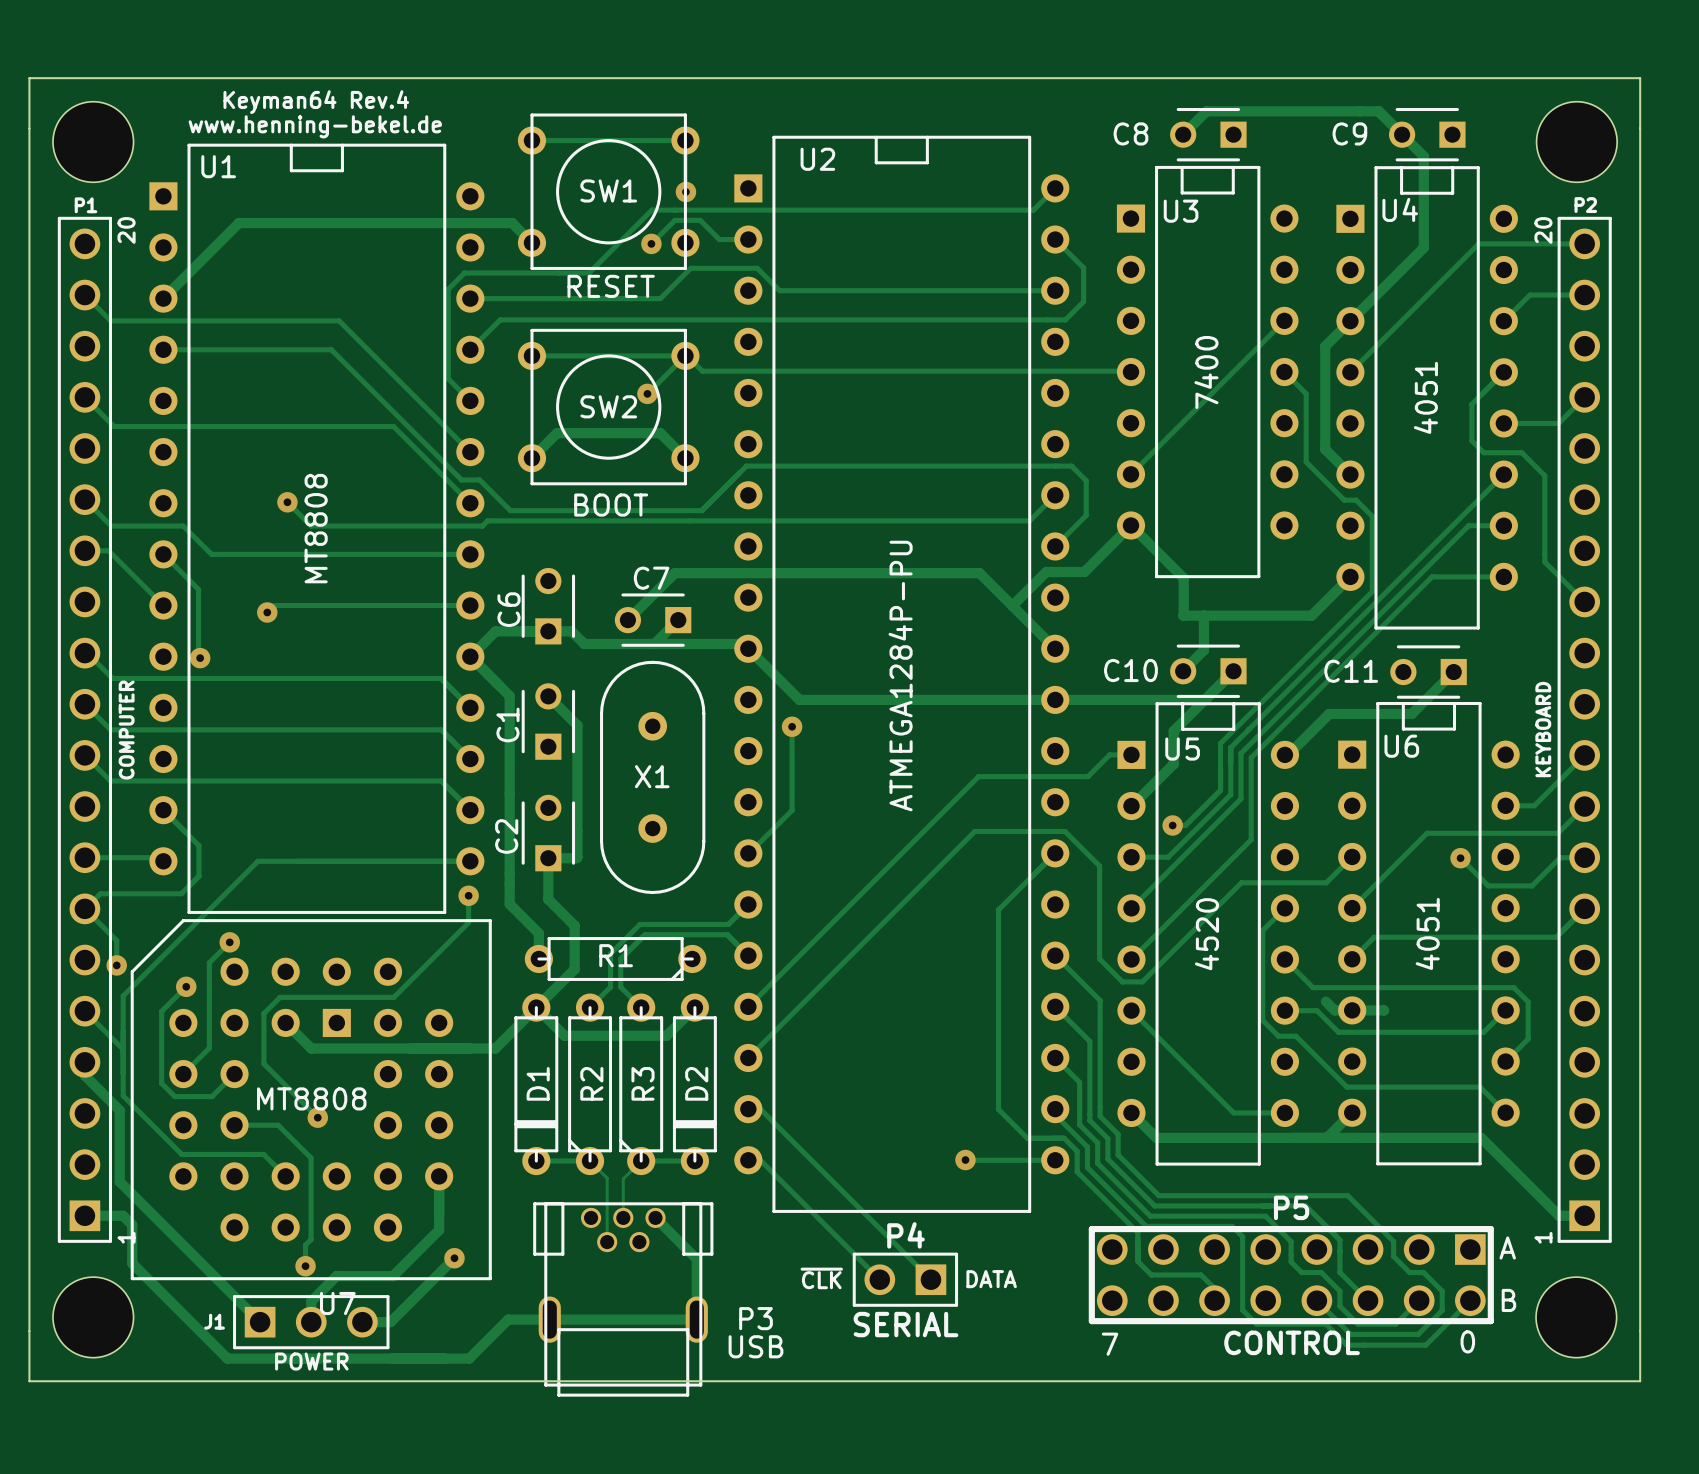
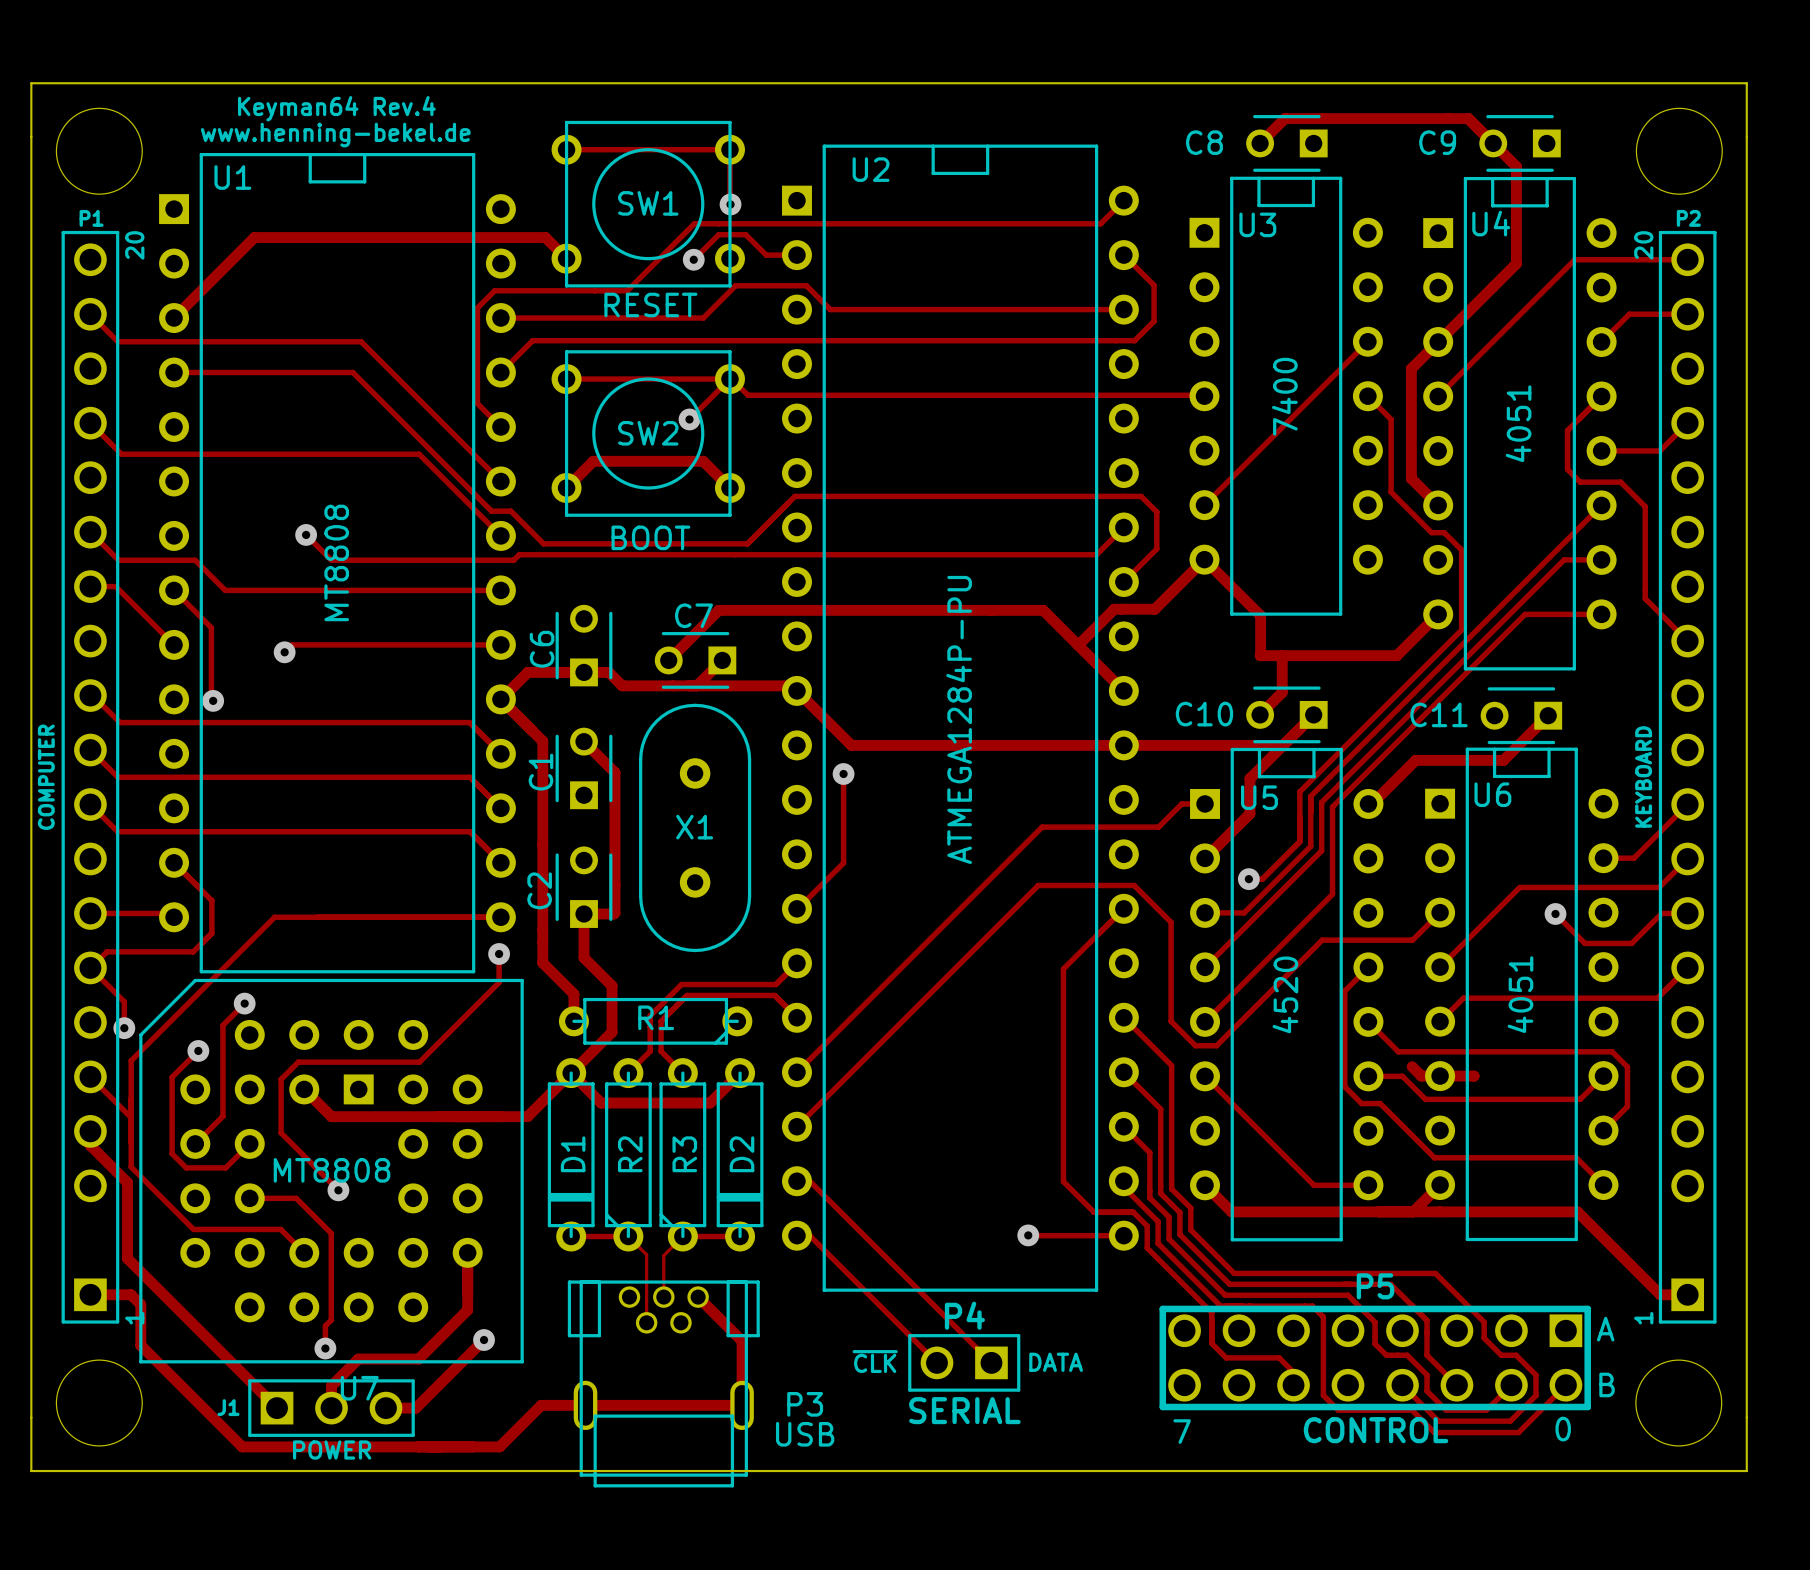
P1 footprint: [57, 216, 113, 1243] -> [61, 230, 120, 1324]
P2 footprint: [1557, 216, 1612, 1243] -> [1658, 230, 1717, 1324]
P1 value position: COMPUTER (126, 730) -> COMPUTER (46, 777)

